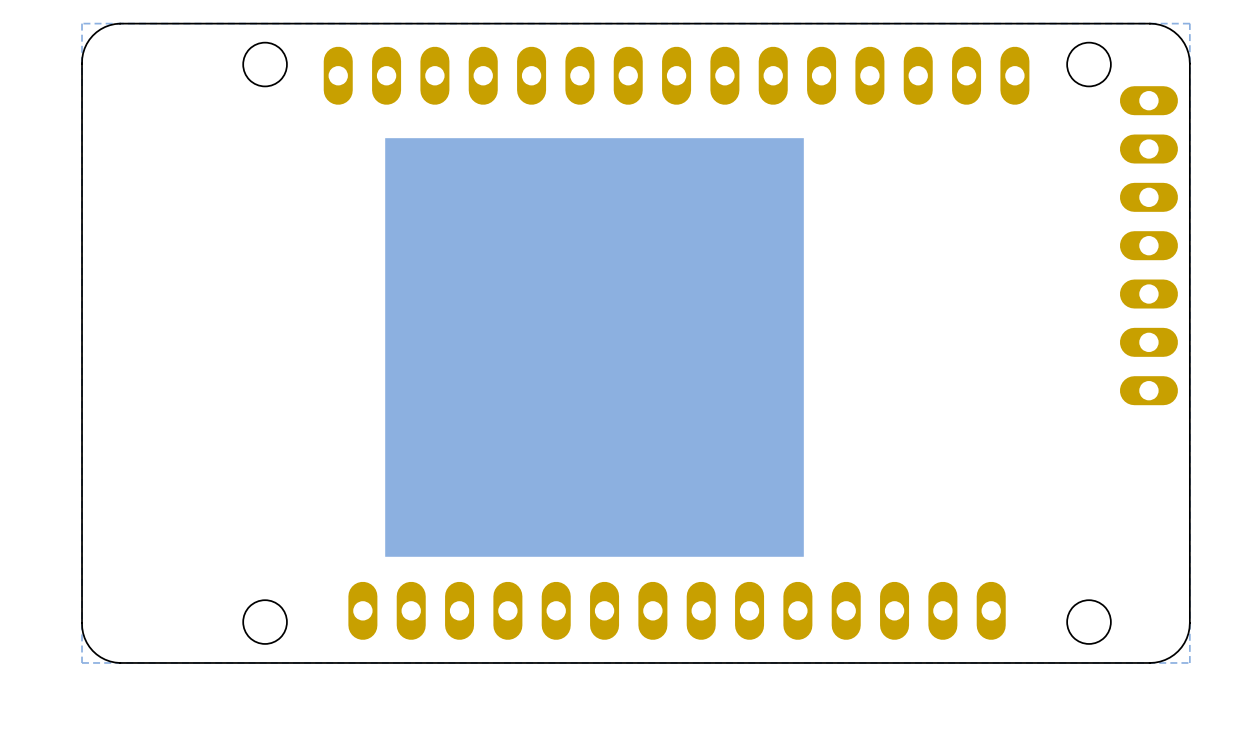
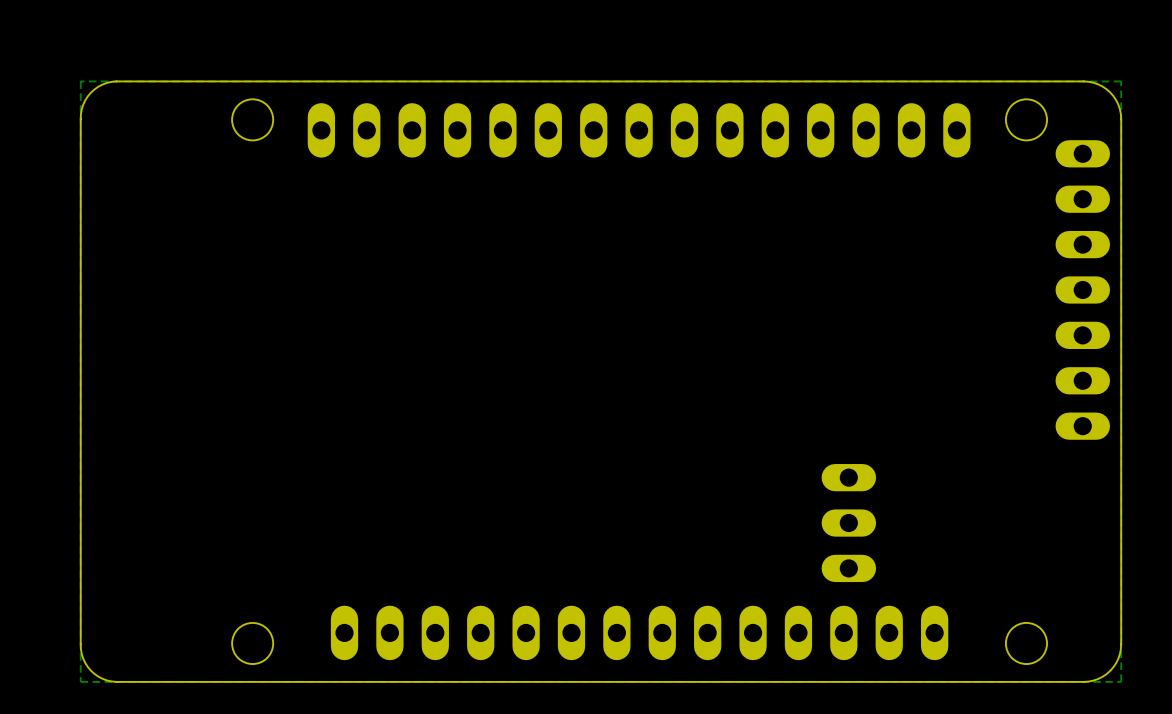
drawing: [385, 138, 804, 557] -> none
part: none -> (848, 523)

